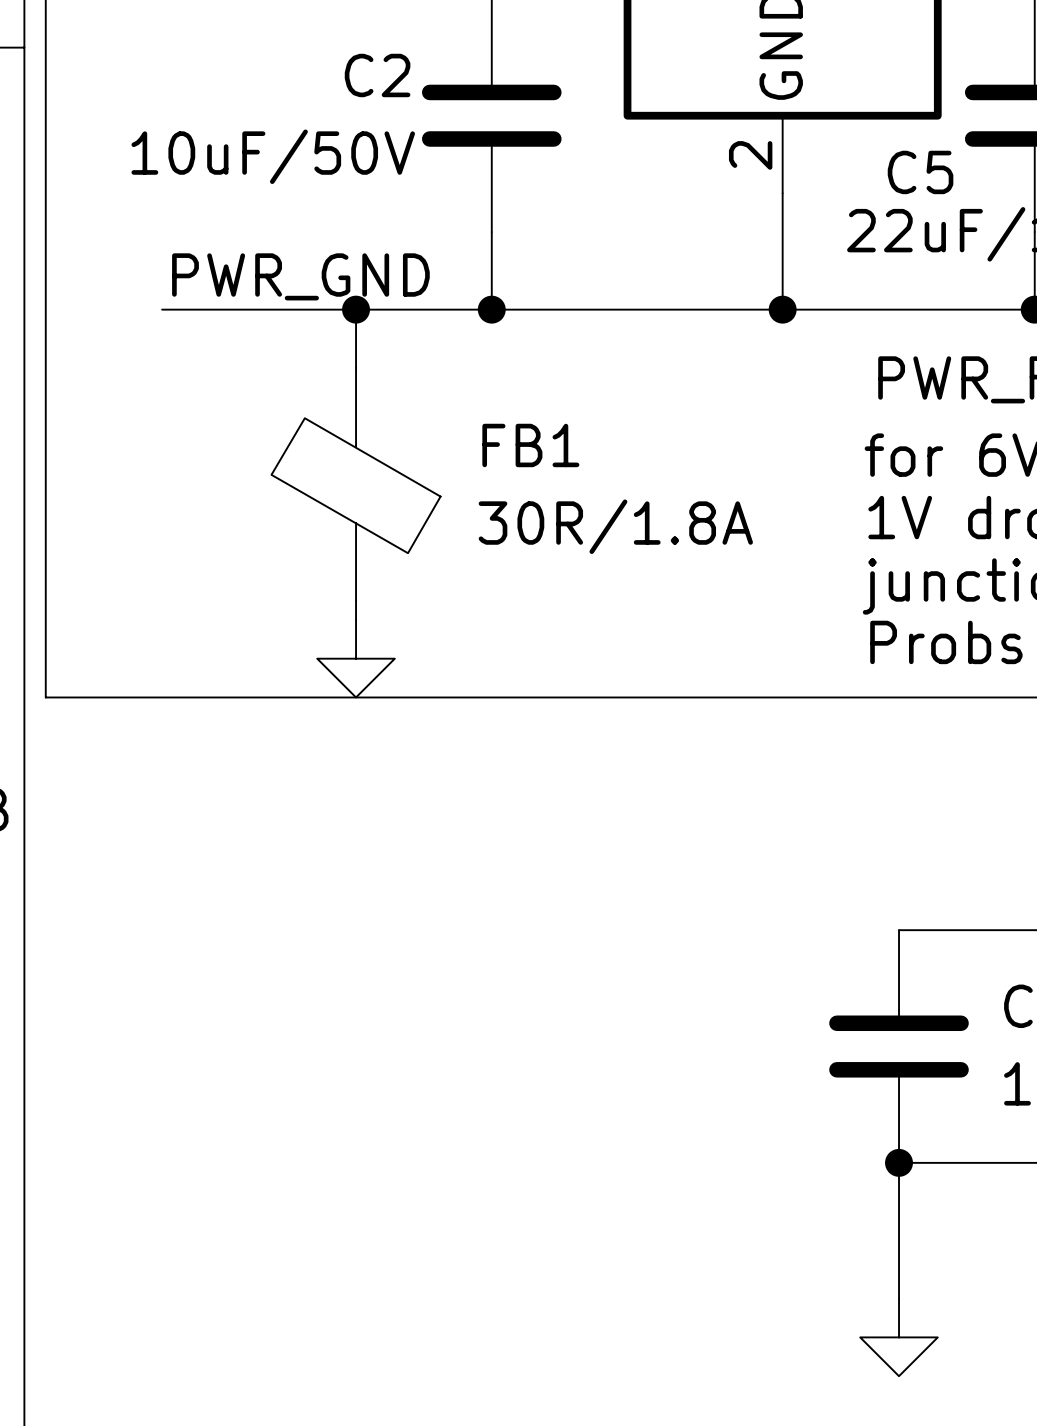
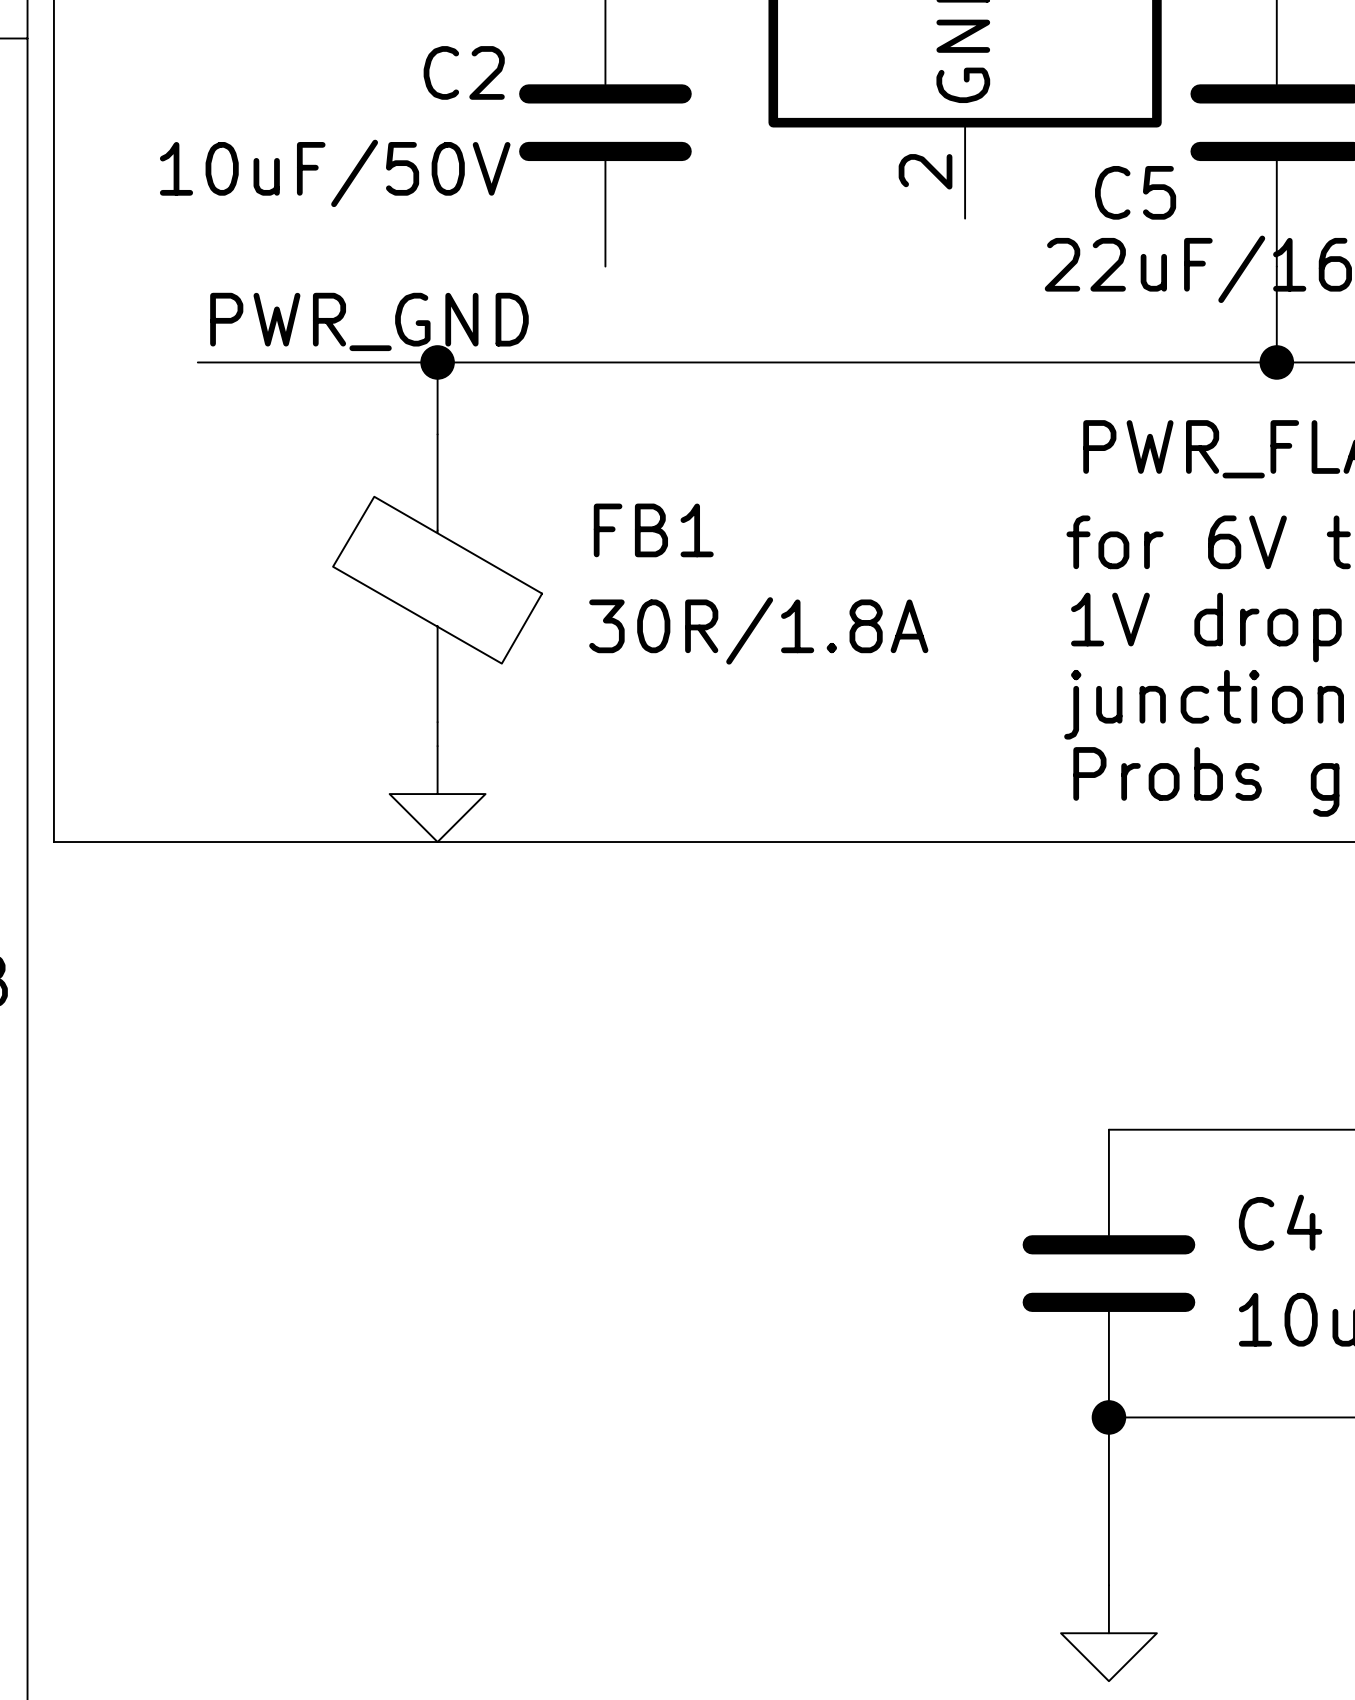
wire: (782, 193) (782, 309) -> none
wire: (491, 232) (491, 309) -> none
junction: (491, 309) -> none
junction: (782, 309) -> none

